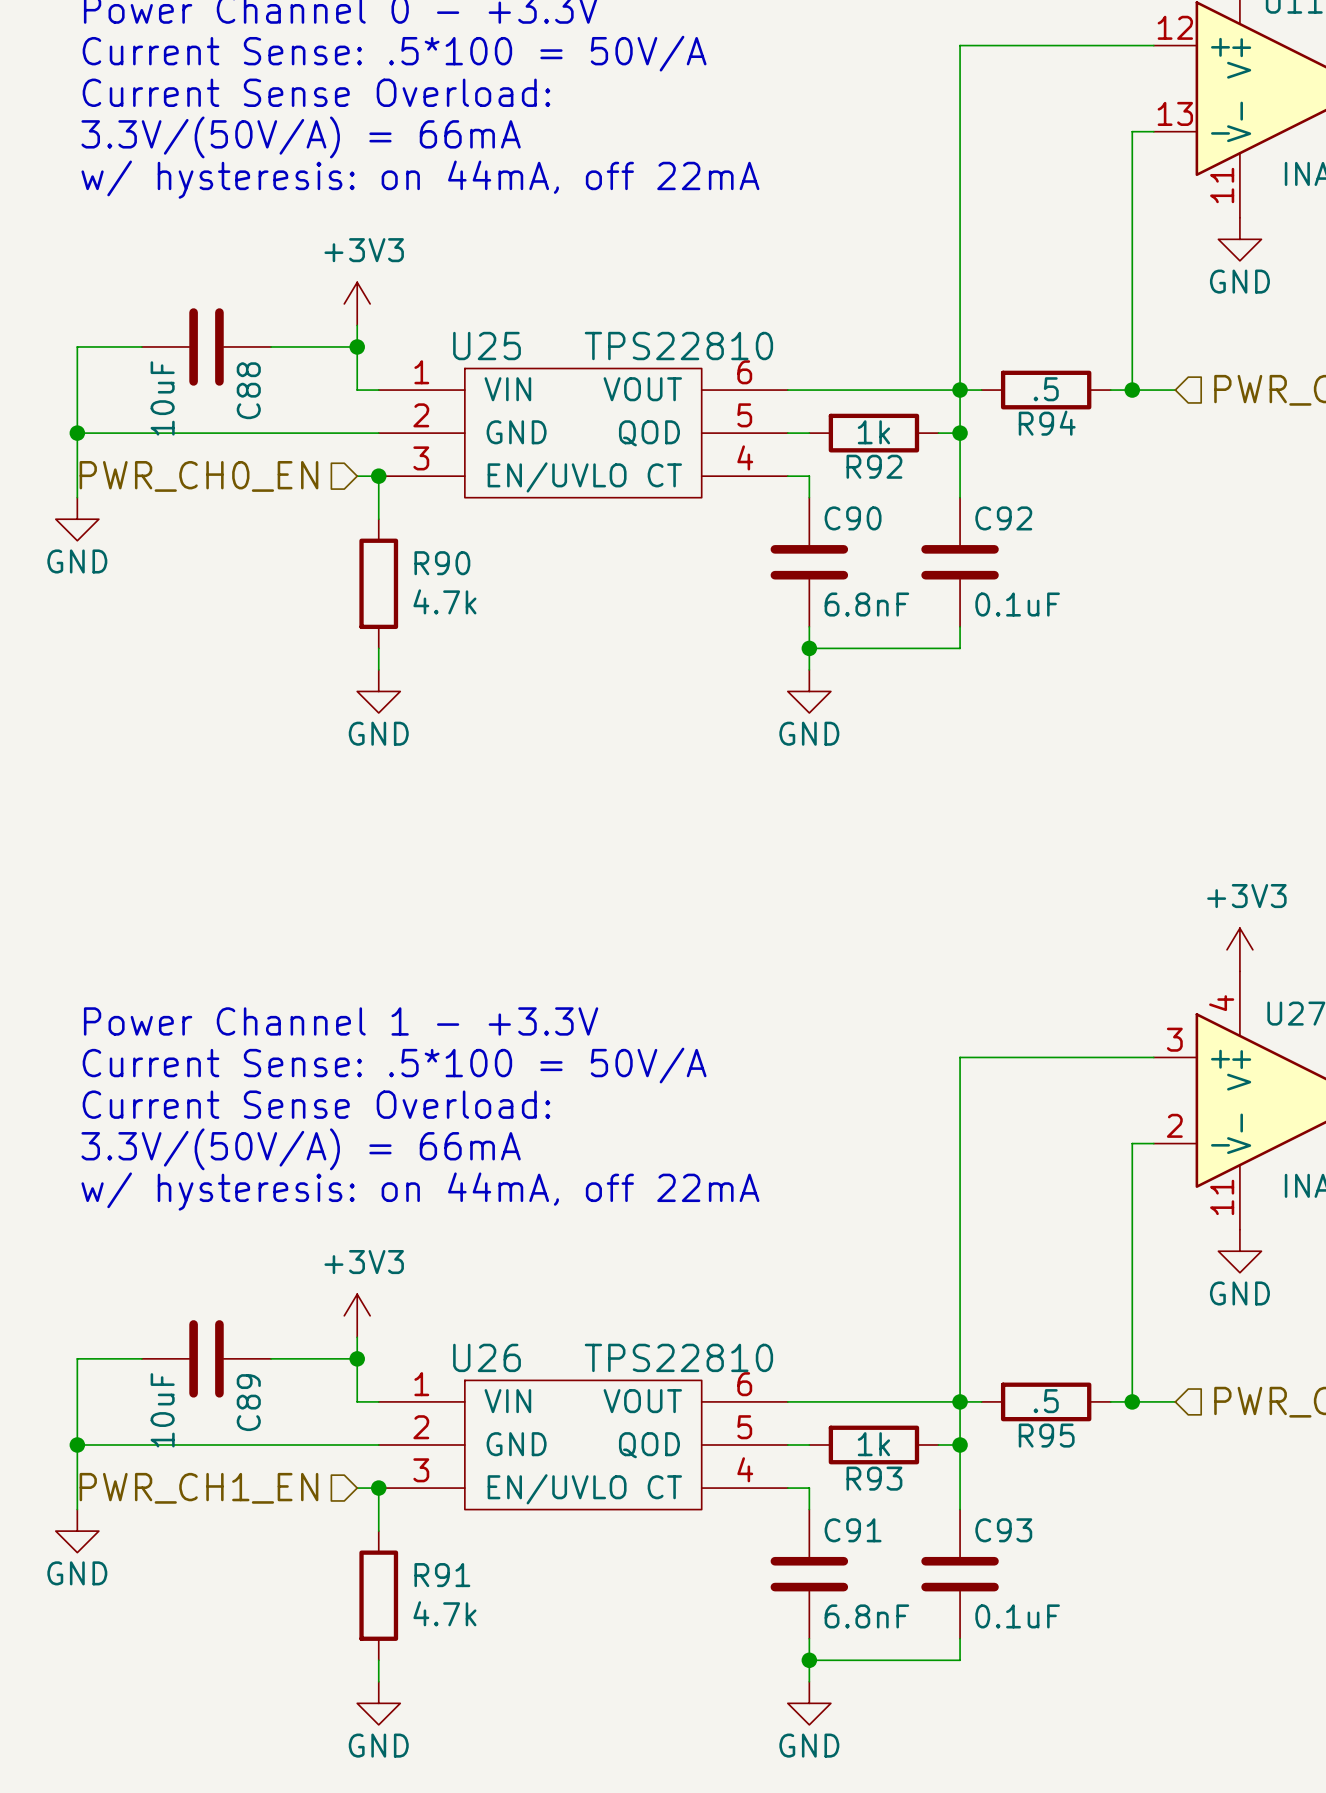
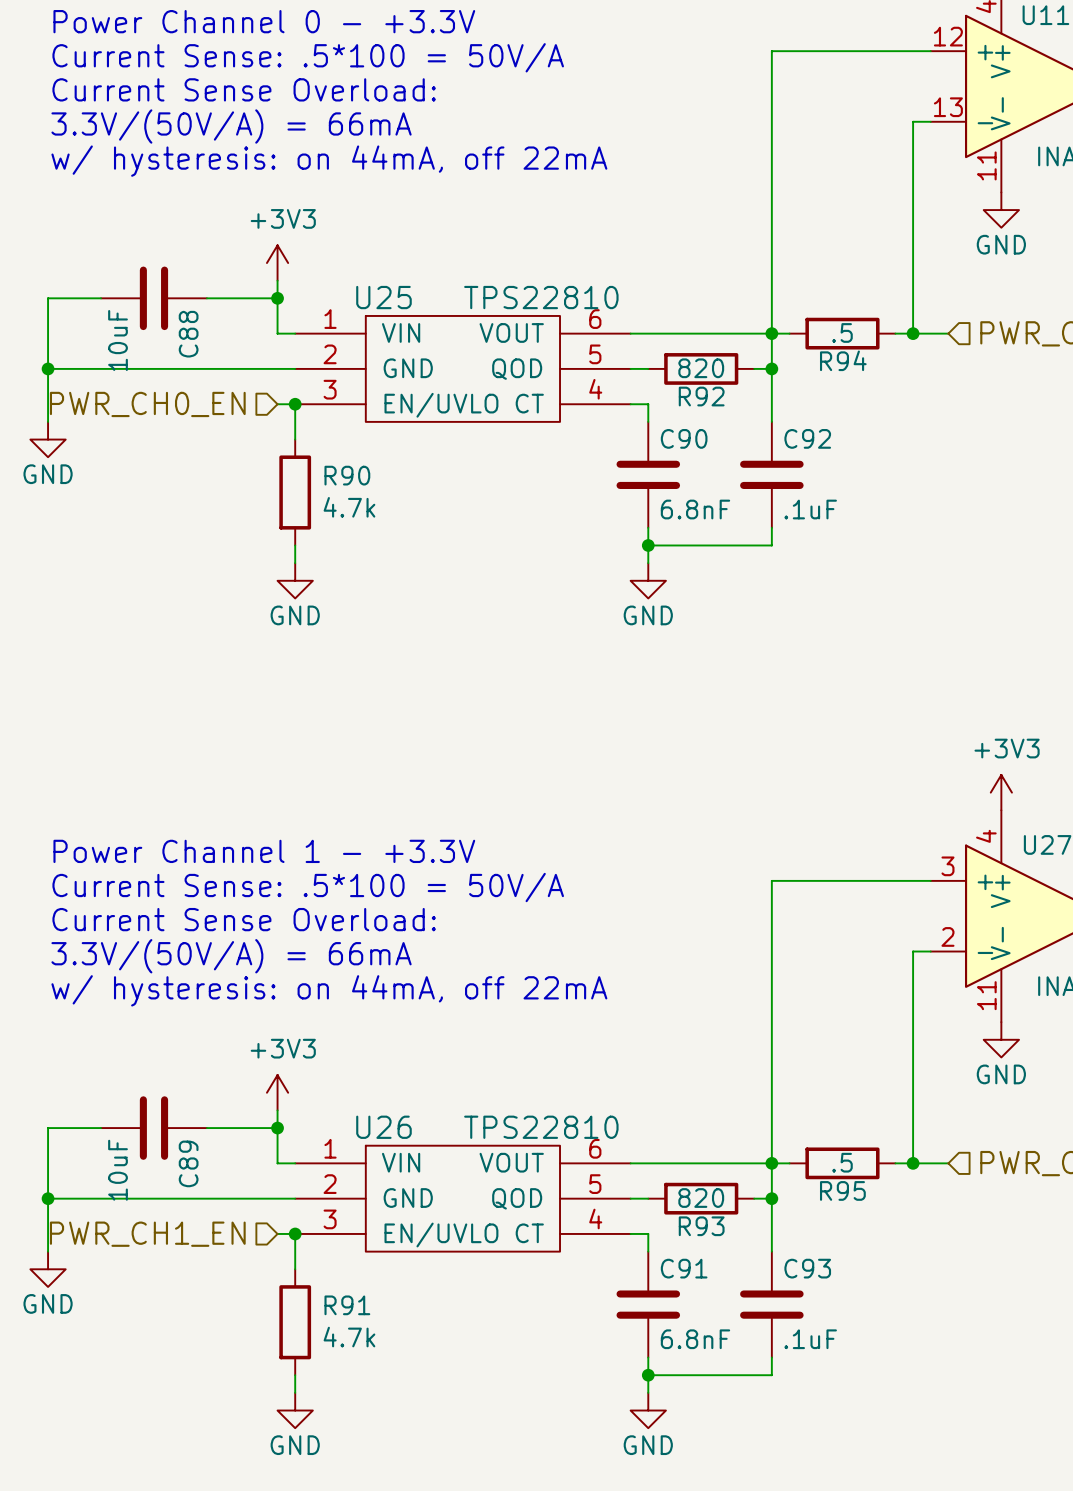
R92 value: 1k (873, 432) -> 820 (701, 368)
C92 value: 0.1uF (1017, 604) -> .1uF (810, 509)
R93 value: 1k (873, 1444) -> 820 (701, 1198)
C93 value: 0.1uF (1017, 1616) -> .1uF (810, 1339)

